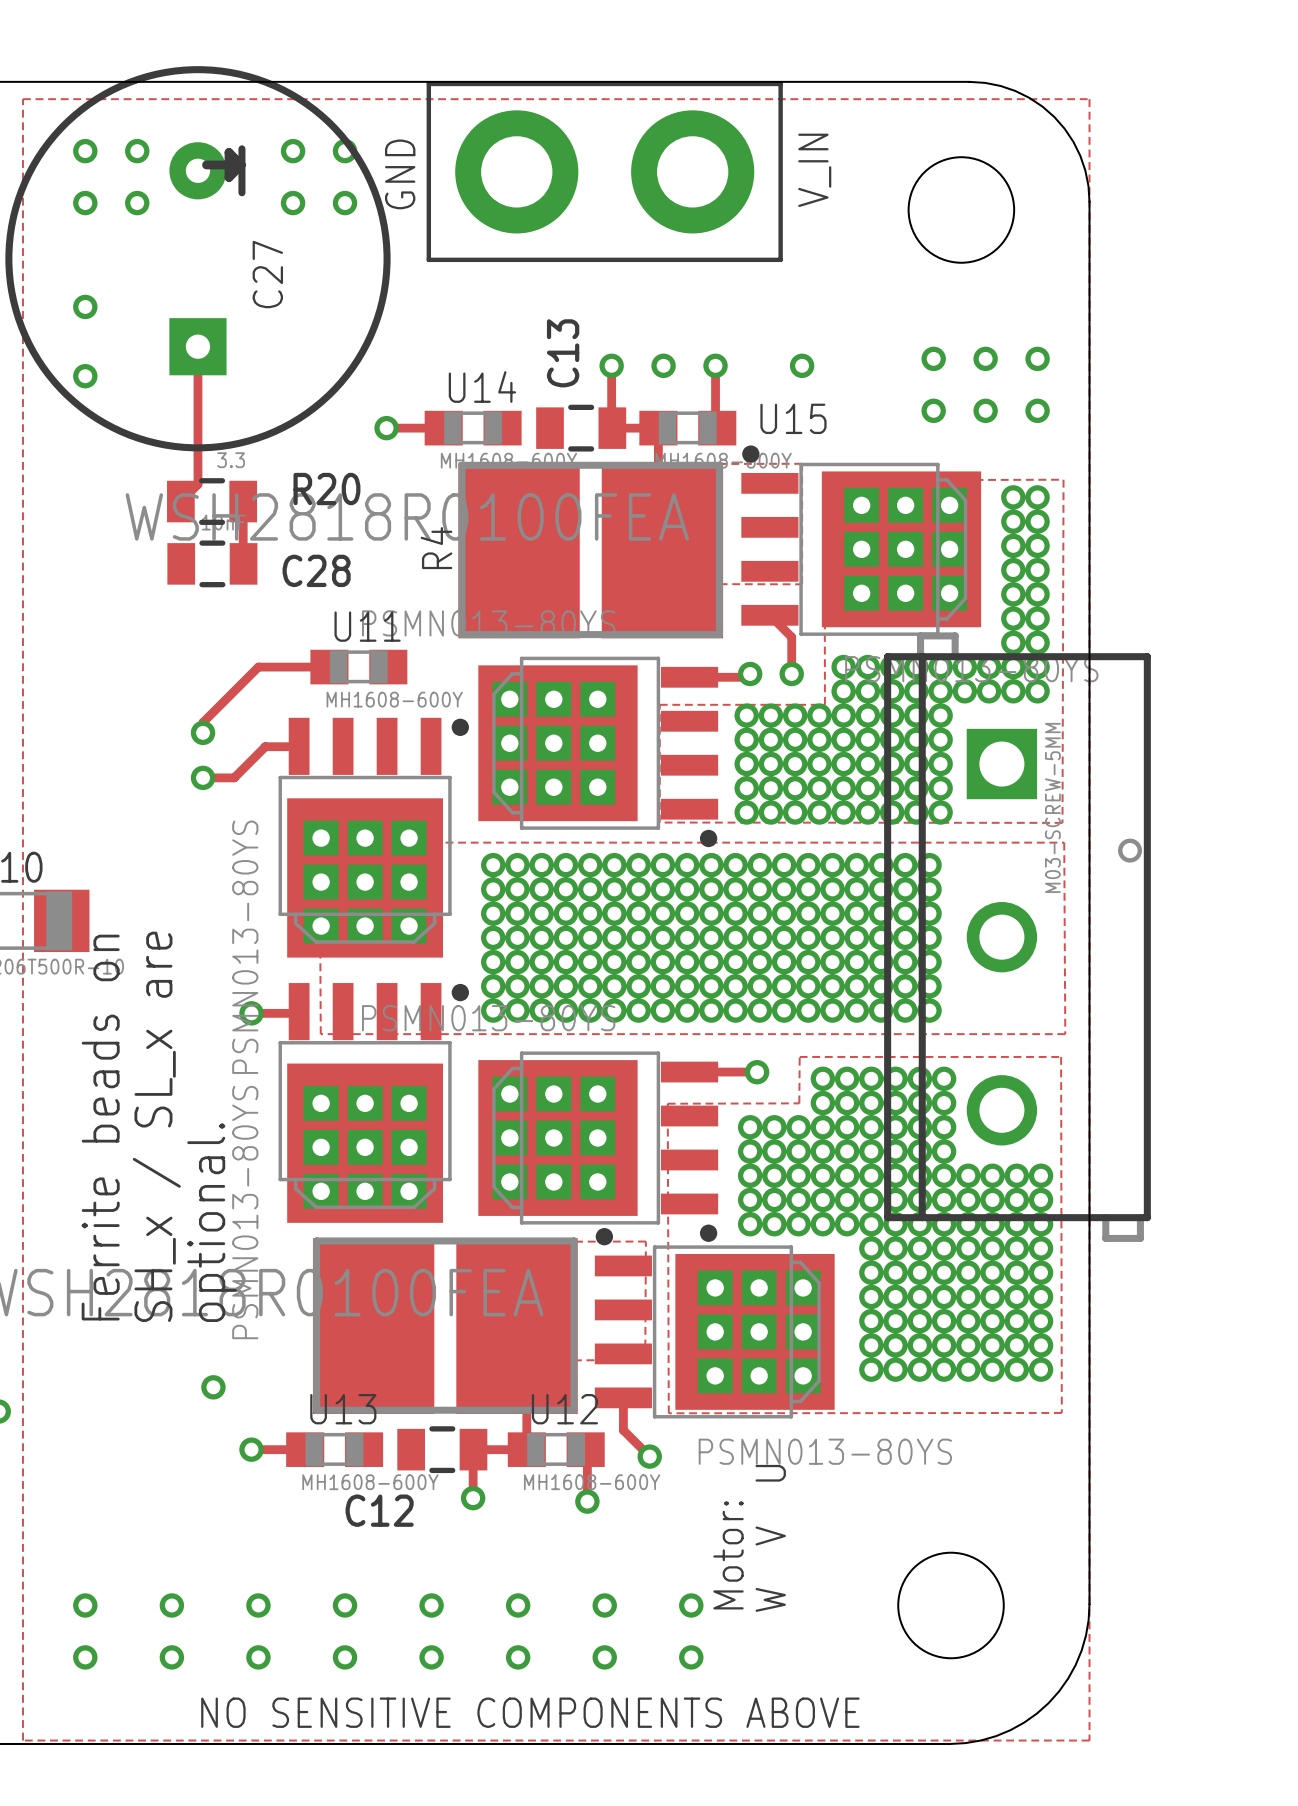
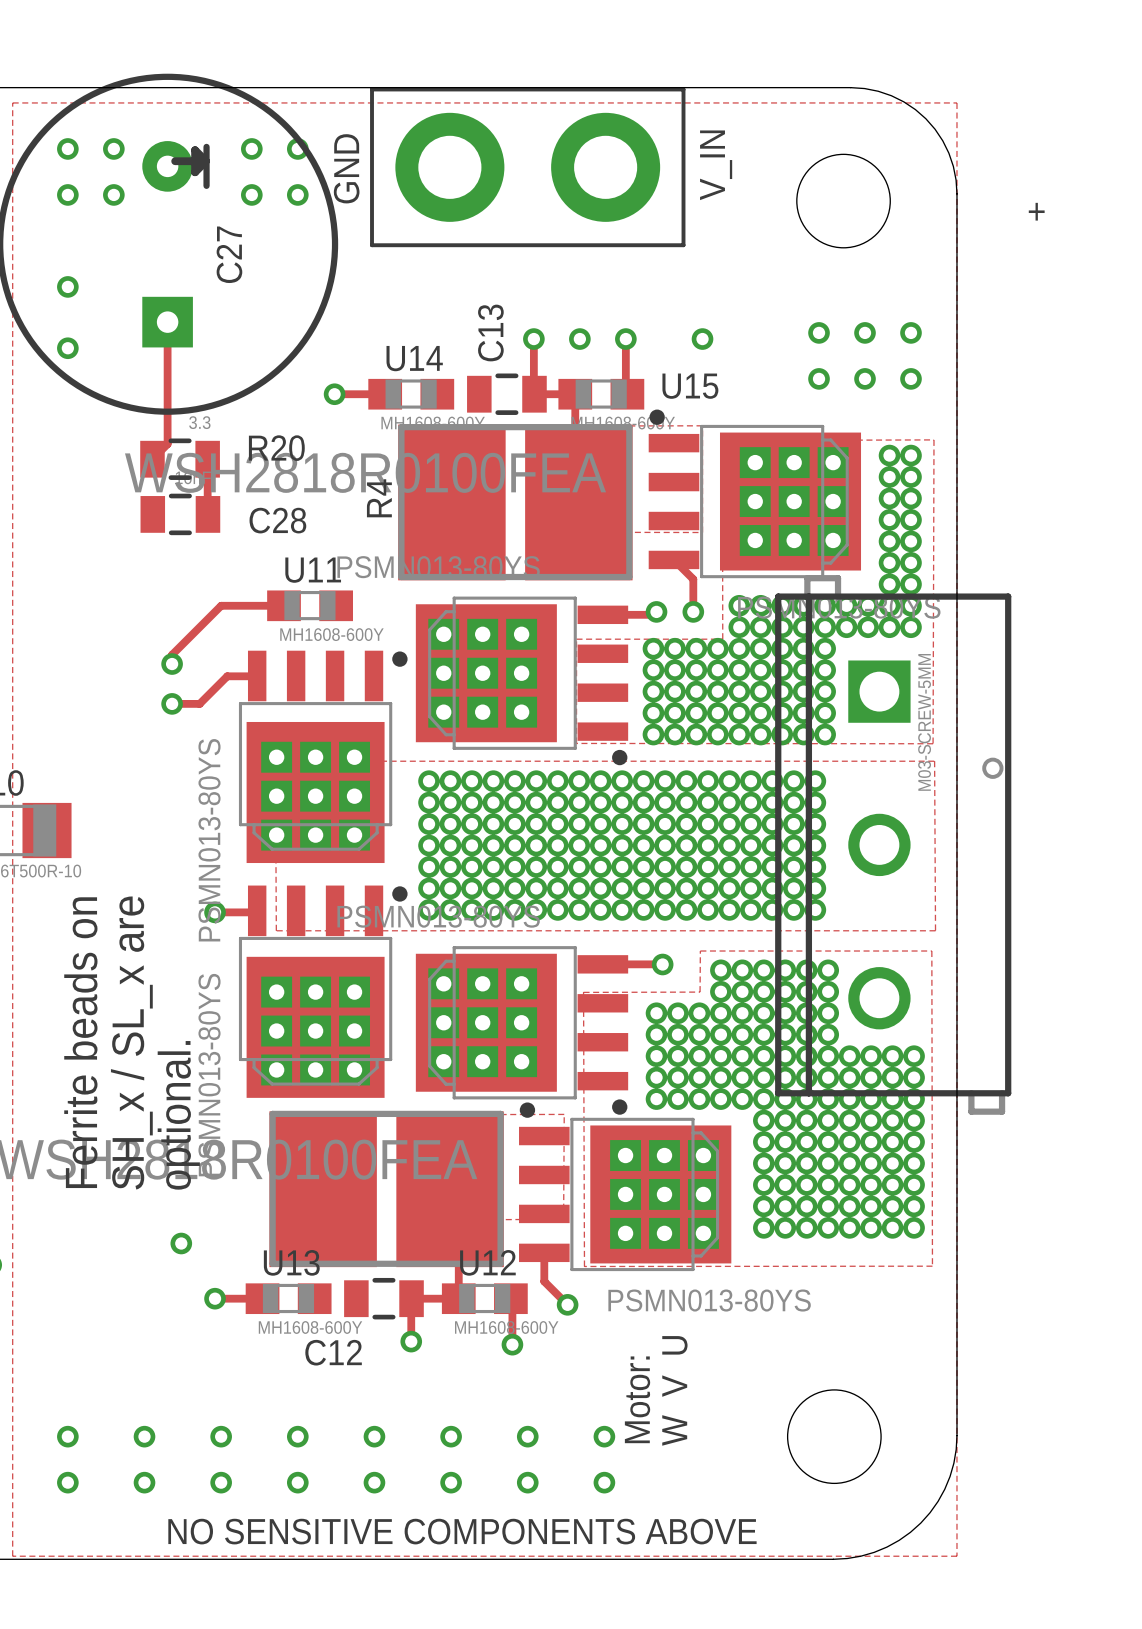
text: none -> + (1036, 211)

